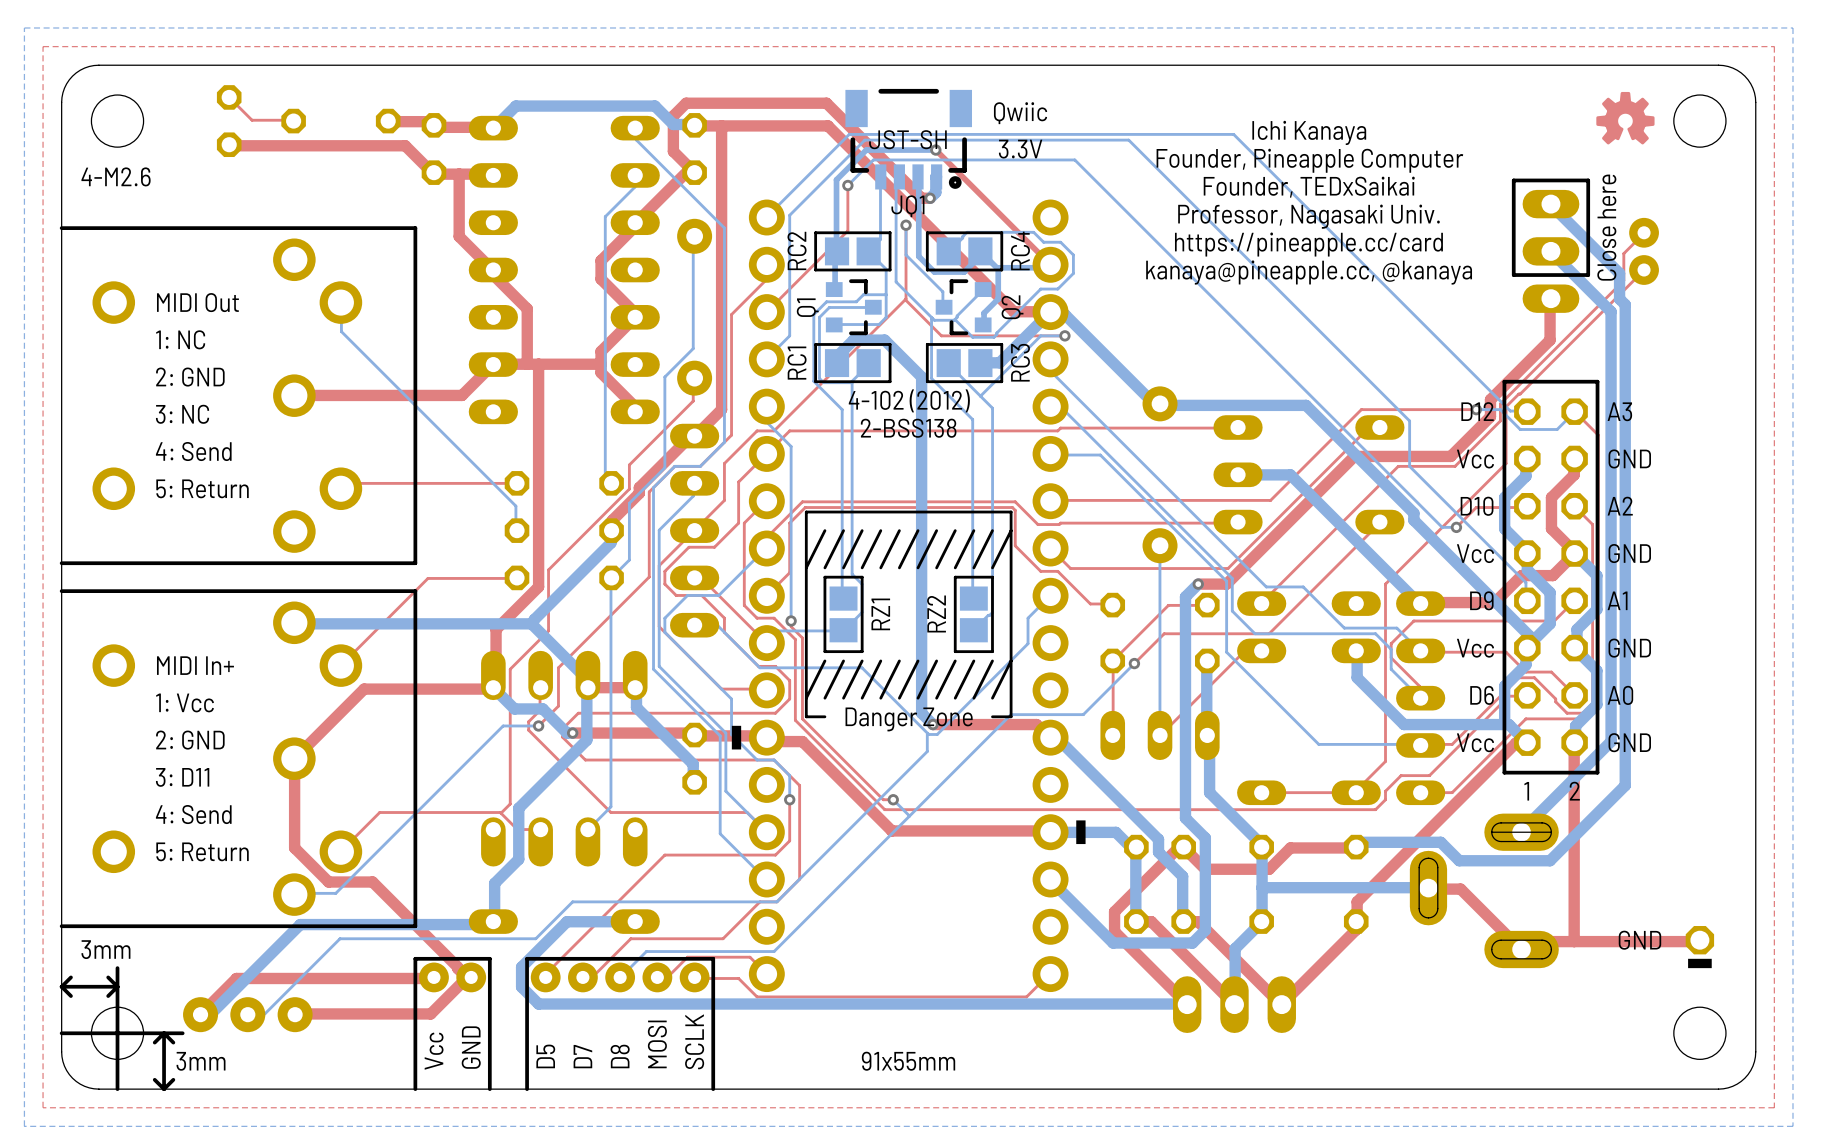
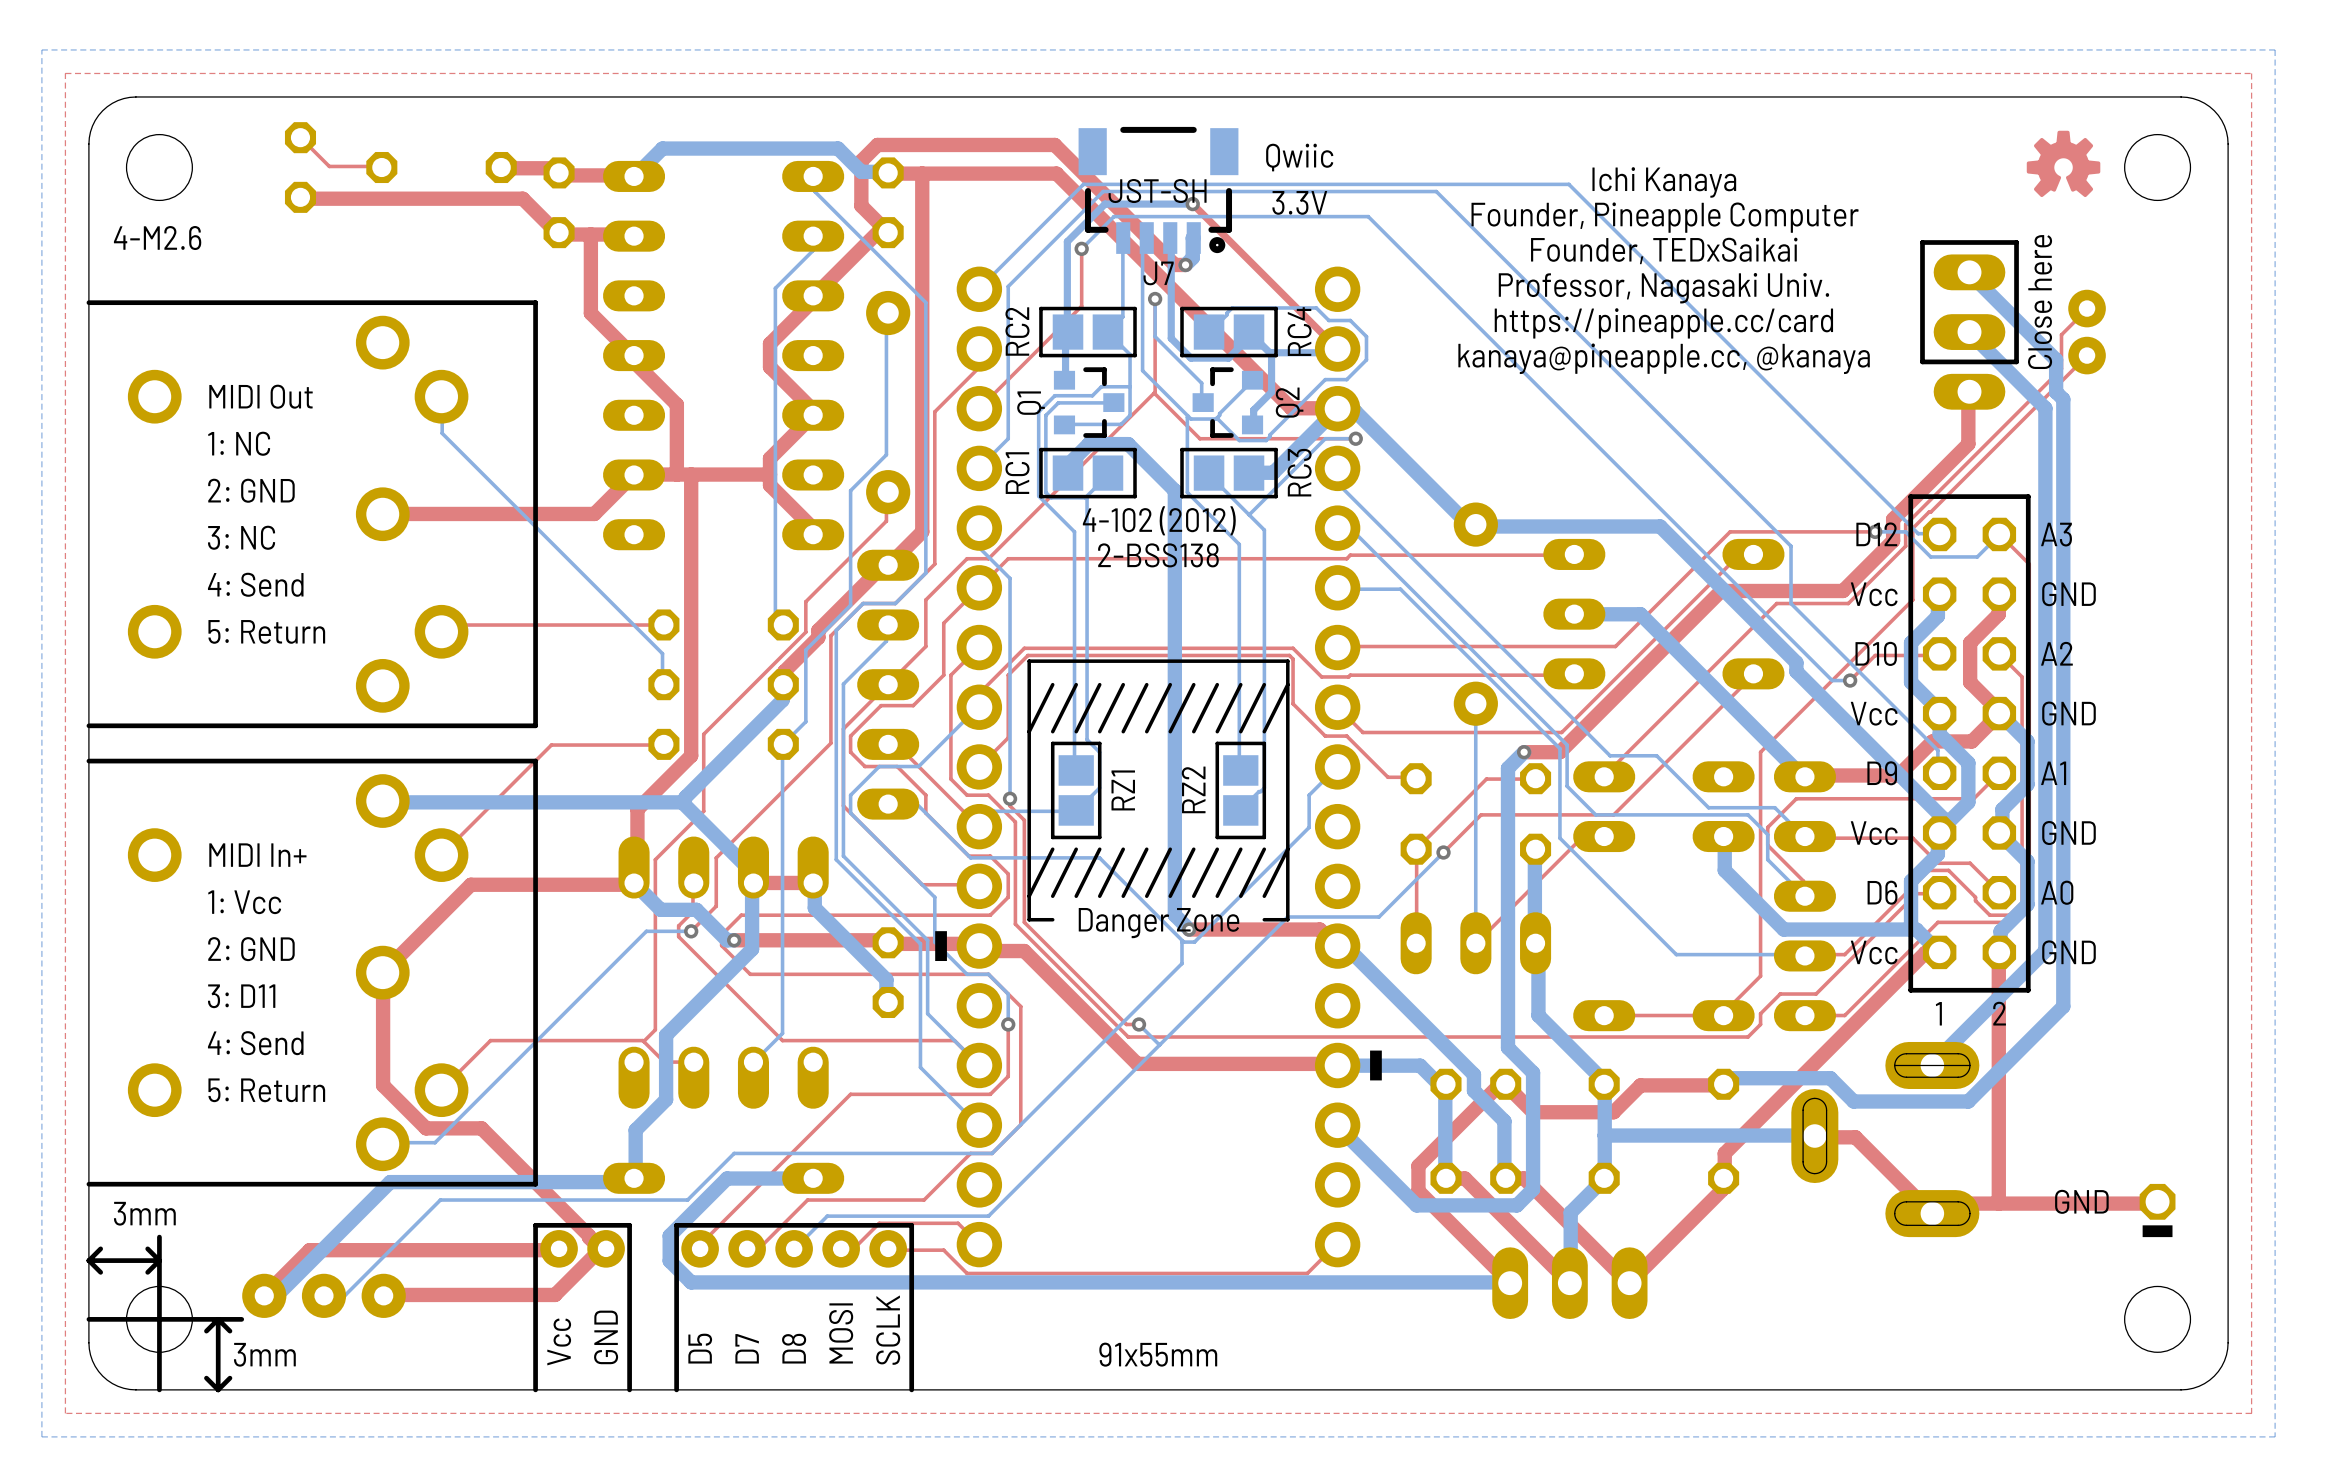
JQ1 name: JQ1 (907, 206) -> J7 (1158, 273)

